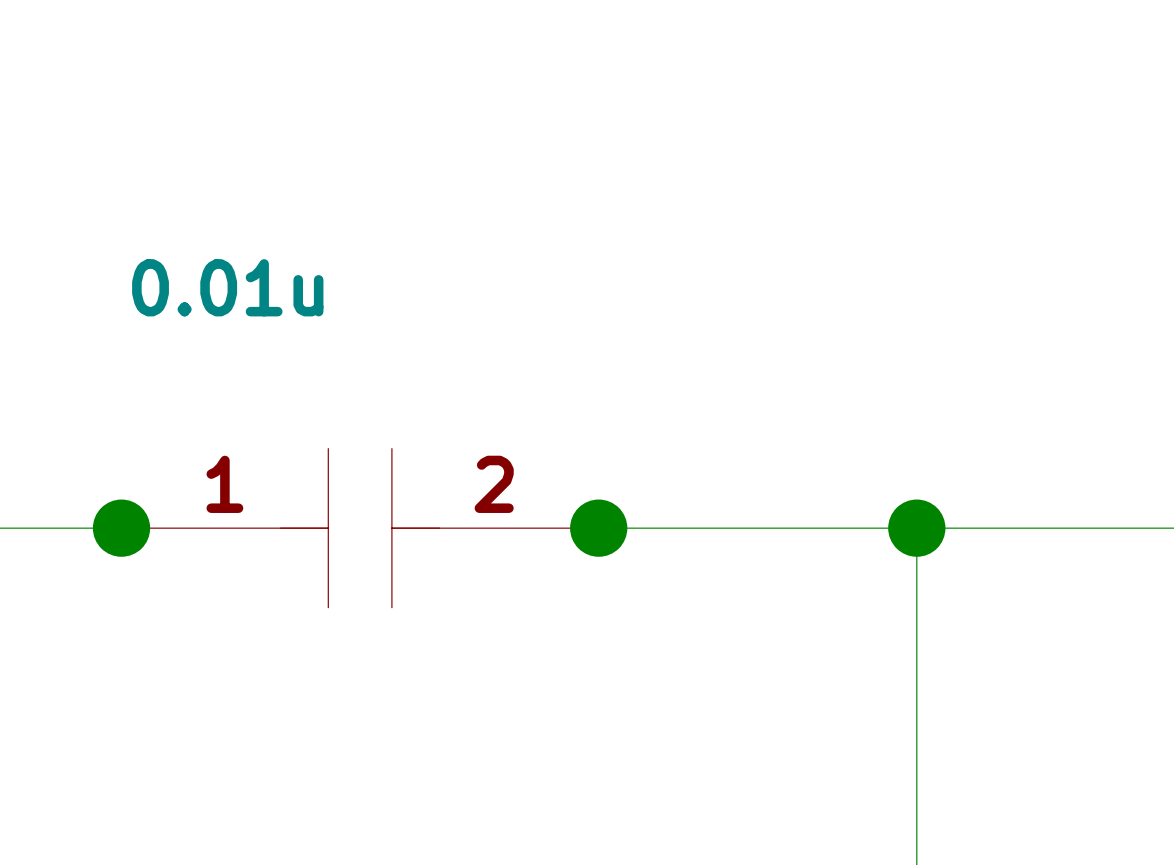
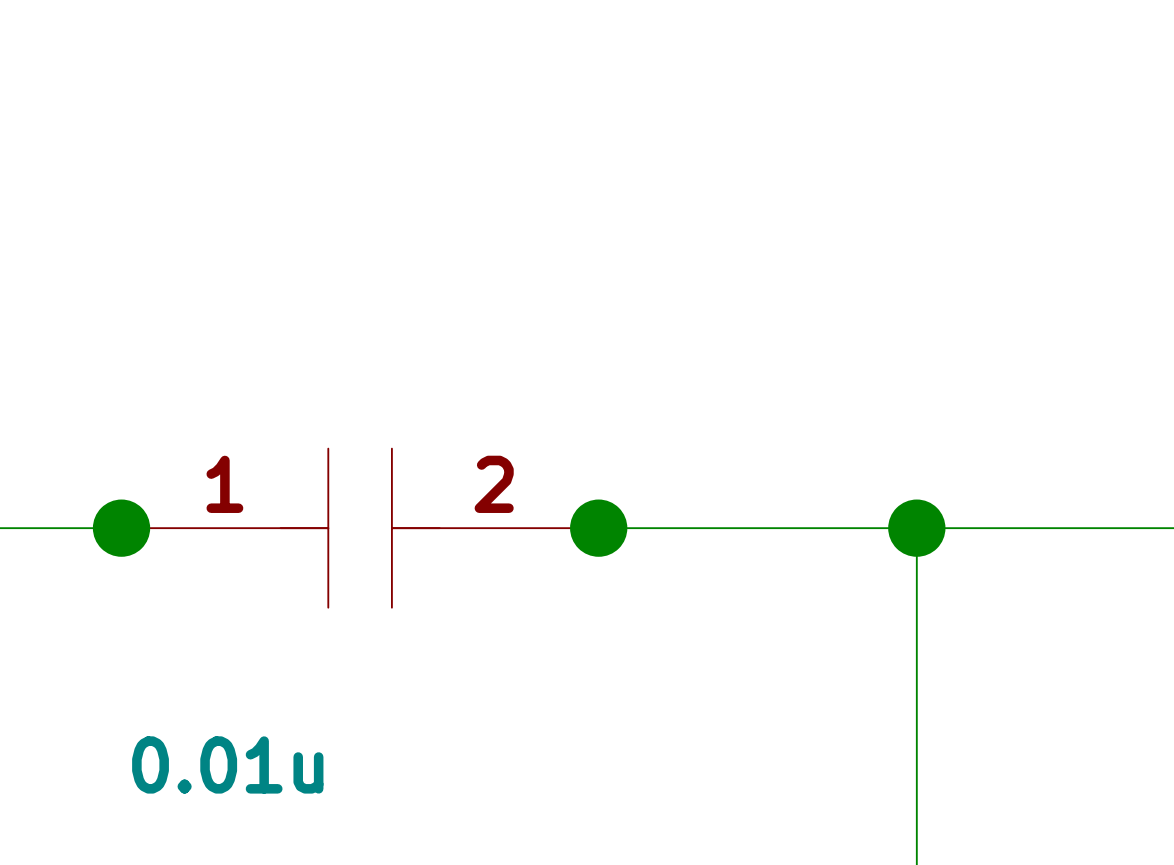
part value position: 0.01u (227, 287) -> 0.01u (227, 764)

